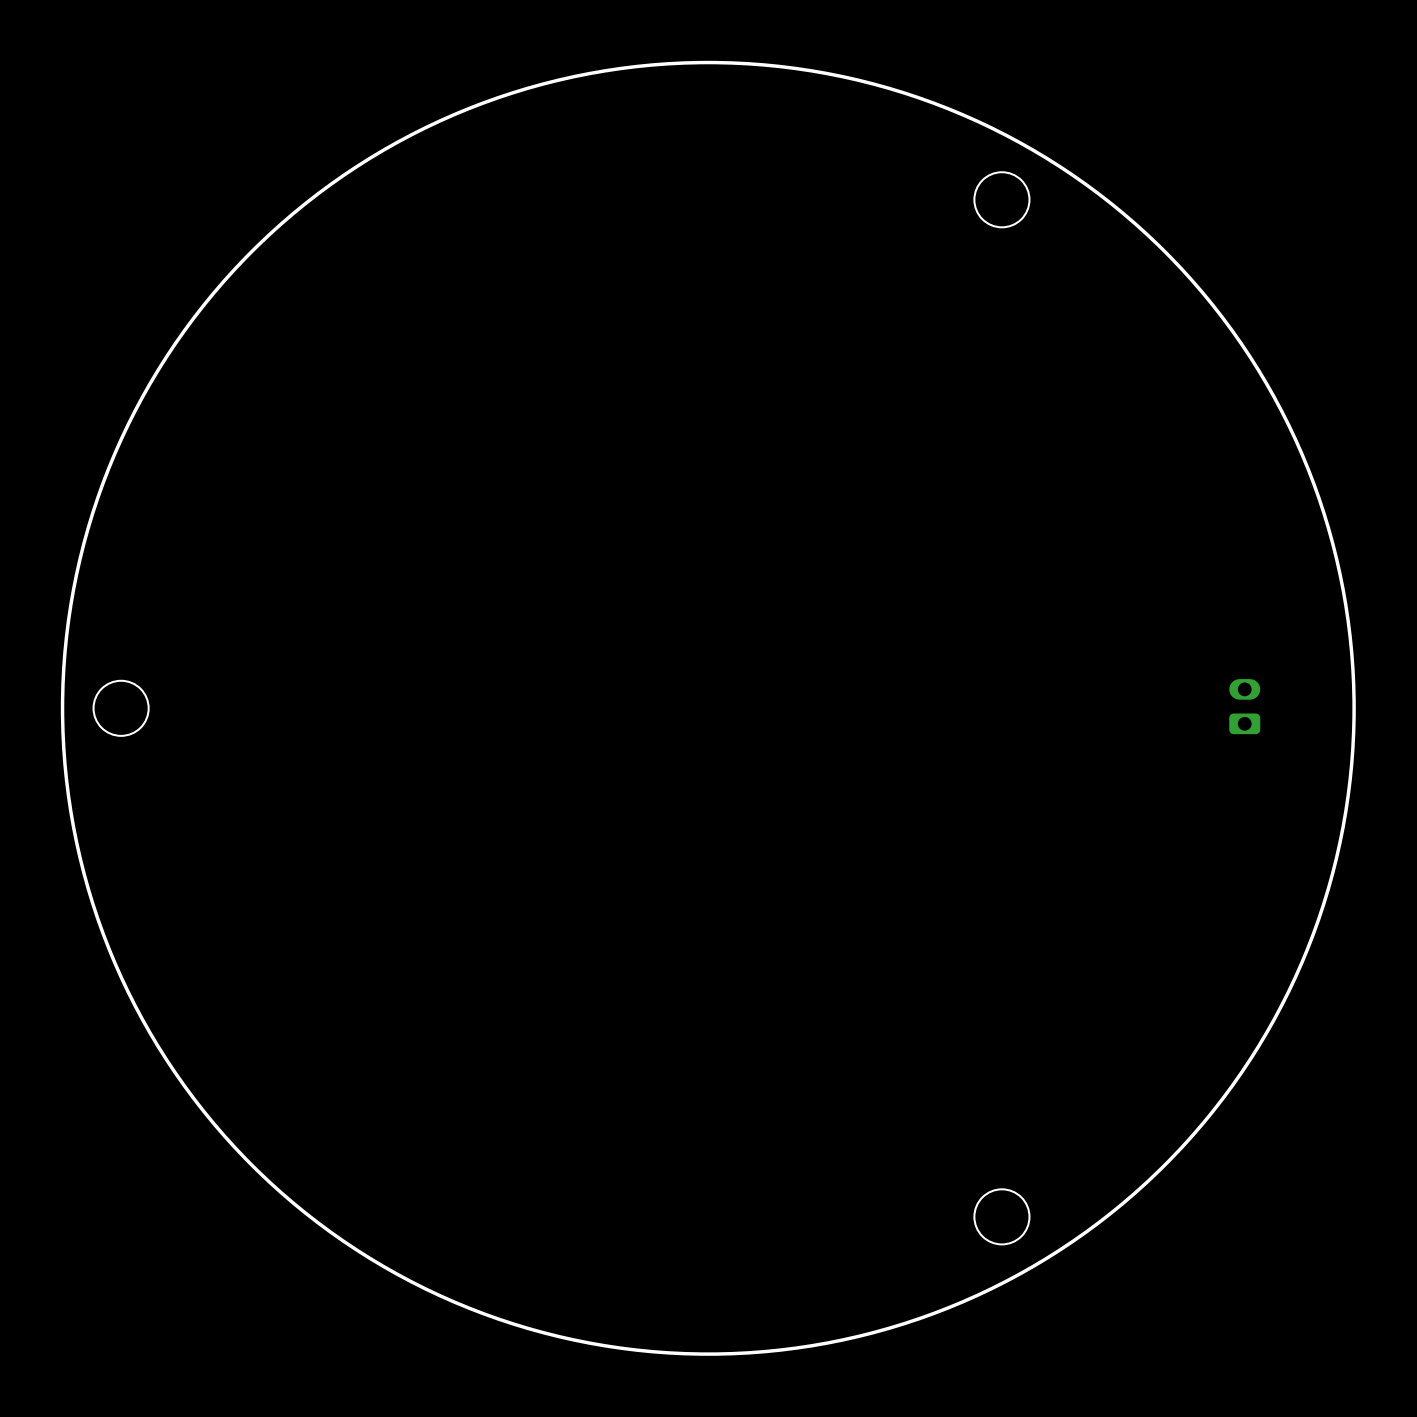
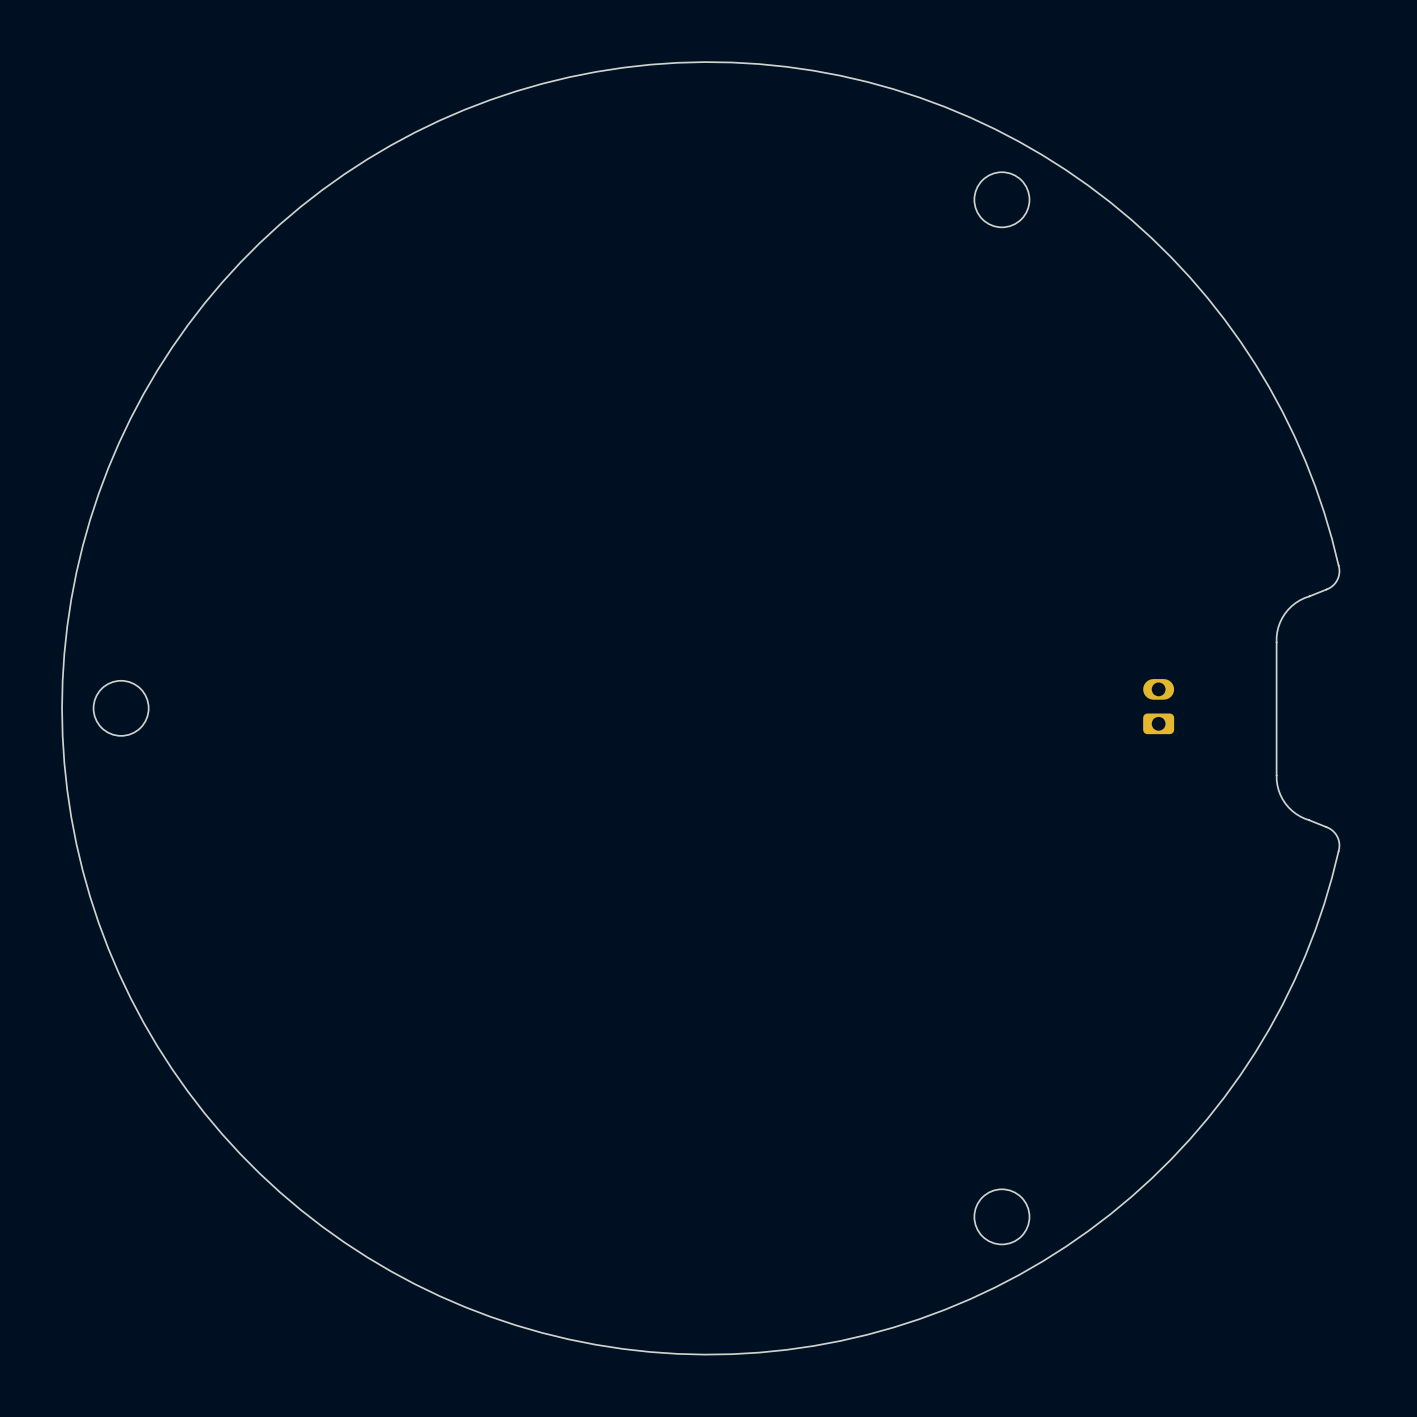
round board edge: [60, 60, 1356, 1356] -> none
board edge: none -> (1338, 565) (1324, 512) (1305, 461) (1282, 411) (1240, 341) (1207, 297) (1170, 257) (1131, 219) (1065, 170) (1019, 141) (944, 106) (893, 89) (813, 70) (759, 64) (677, 62) (622, 67) (569, 77) (516, 91) (439, 120) (390, 145) (344, 174) (279, 224) (240, 262) (187, 325) (157, 370) (130, 418) (98, 493) (82, 546) (71, 599) (64, 653) (62, 708) (64, 762) (76, 844) (90, 896) (108, 948) (130, 998) (172, 1069) (204, 1113) (240, 1154) (300, 1209) (344, 1242) (415, 1284) (464, 1306) (516, 1325) (569, 1339) (622, 1348) (704, 1354) (786, 1349) (840, 1340) (893, 1327) (944, 1309) (994, 1287) (1065, 1246) (1131, 1197) (1170, 1159) (1207, 1118) (1255, 1052) (1282, 1004) (1305, 955) (1324, 904) (1339, 846) (1337, 836) (1332, 830) (1295, 813) (1285, 803) (1278, 790) (1276, 775) (1277, 632) (1282, 618) (1291, 606) (1334, 583) (1339, 575) (1338, 565)
part position: (1244, 706) -> (1158, 706)

